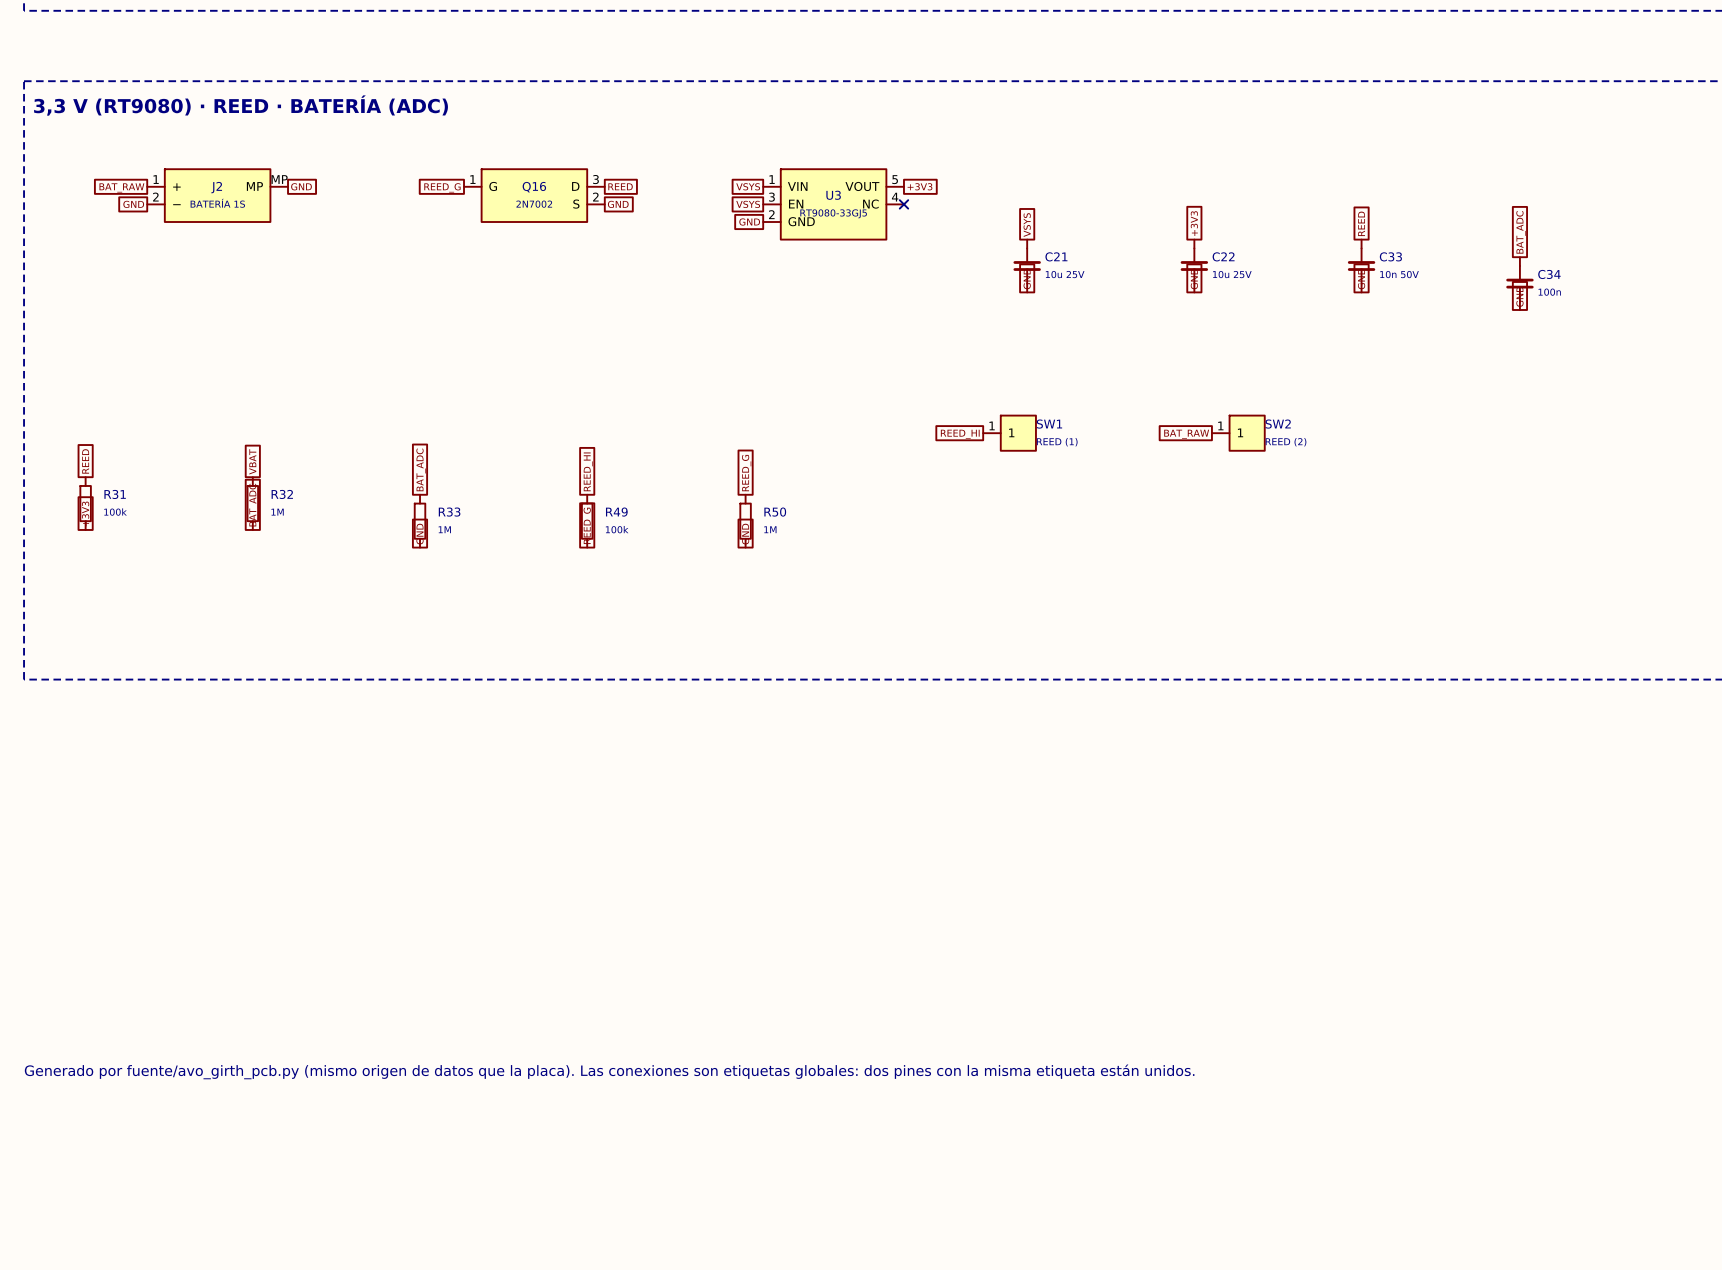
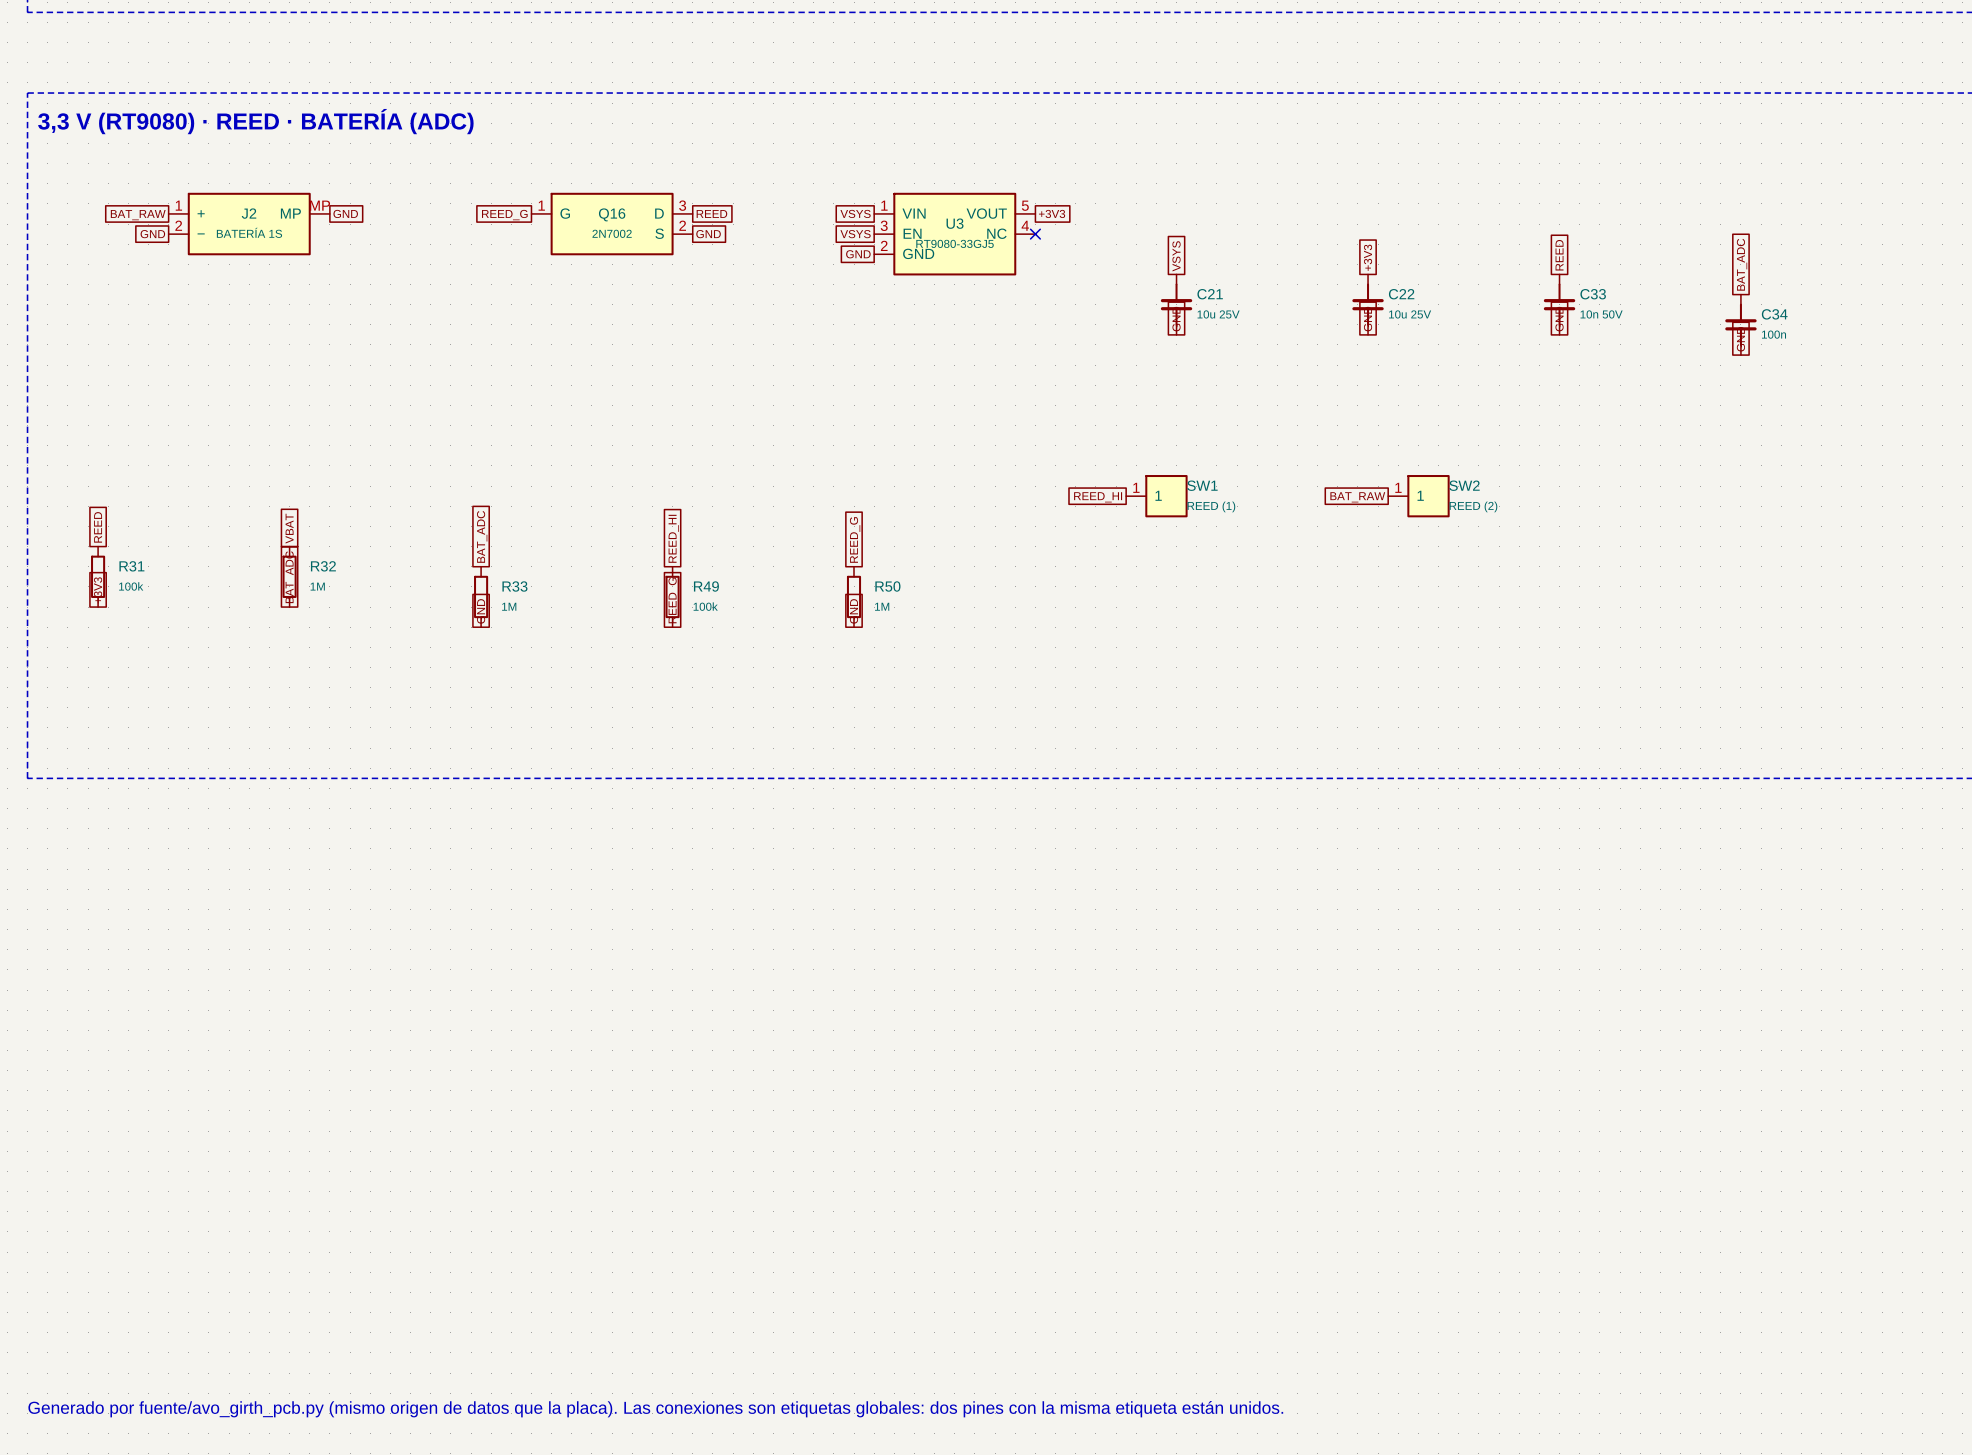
text position: Generado por fuente/avo_girth_pcb.py (mismo origen de datos que la placa). Las conexiones son etiquetas globales: dos pines con la misma etiqueta están unidos. (609, 1071) -> Generado por fuente/avo_girth_pcb.py (mismo origen de datos que la placa). Las conexiones son etiquetas globales: dos pines con la misma etiqueta están unidos. (655, 1409)

